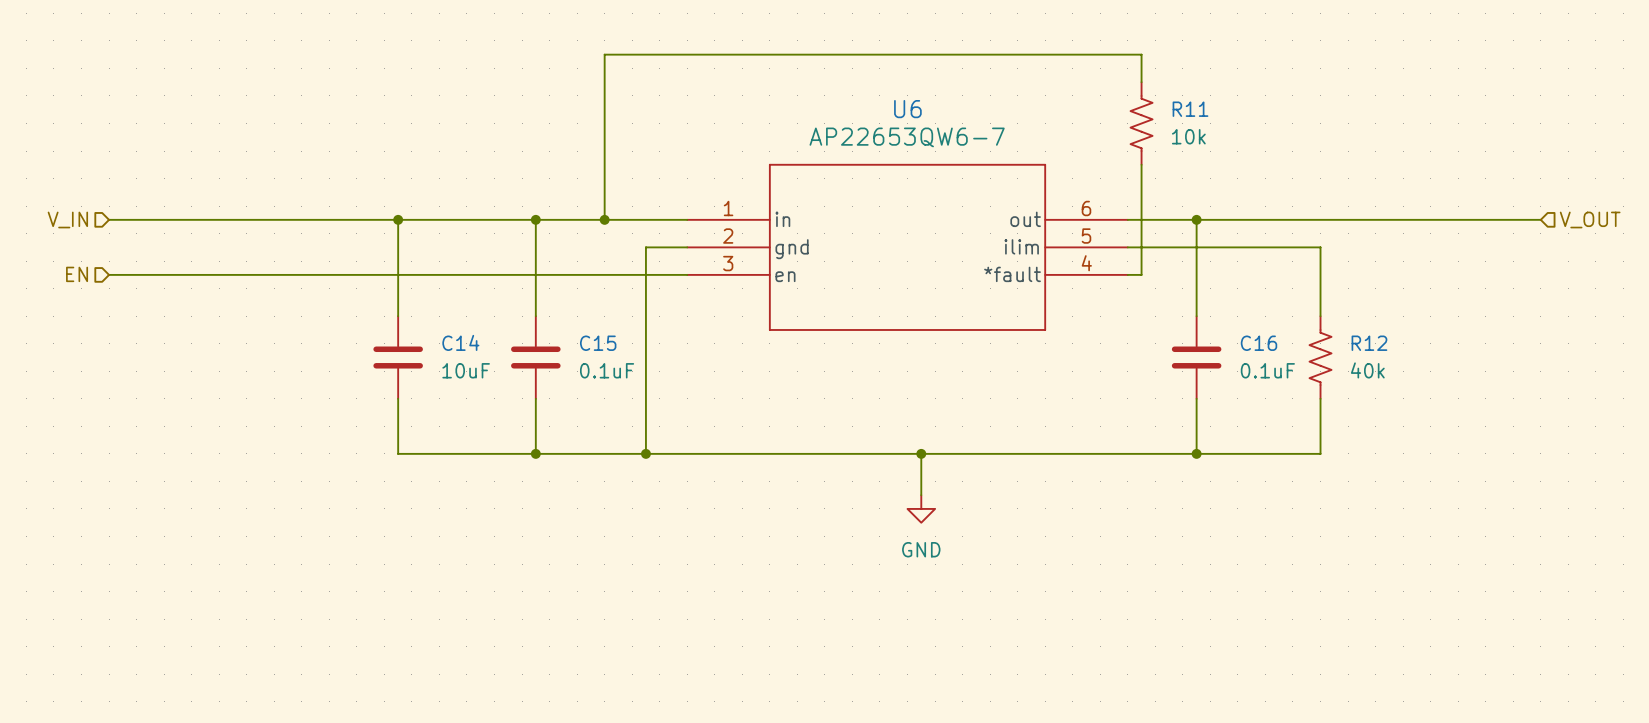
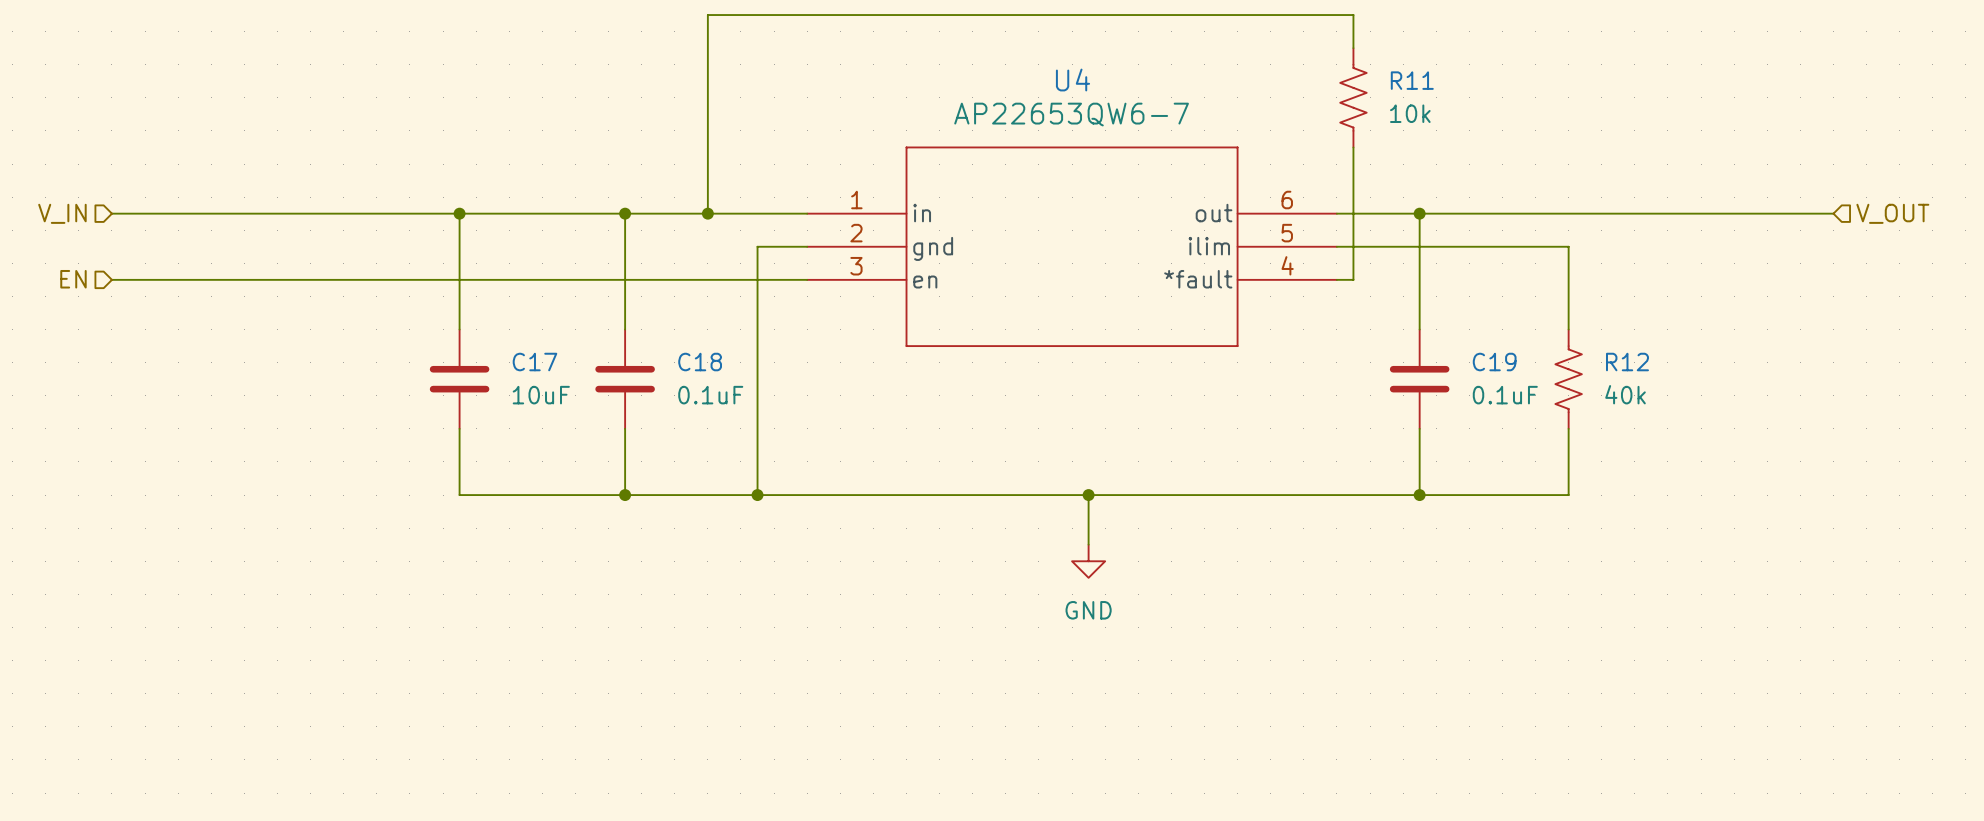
U6 name: U6 (907, 109) -> U4 (1072, 80)
C14 name: C14 (460, 342) -> C17 (534, 362)
C15 name: C15 (598, 343) -> C18 (700, 362)
C16 name: C16 (1259, 343) -> C19 (1494, 362)

